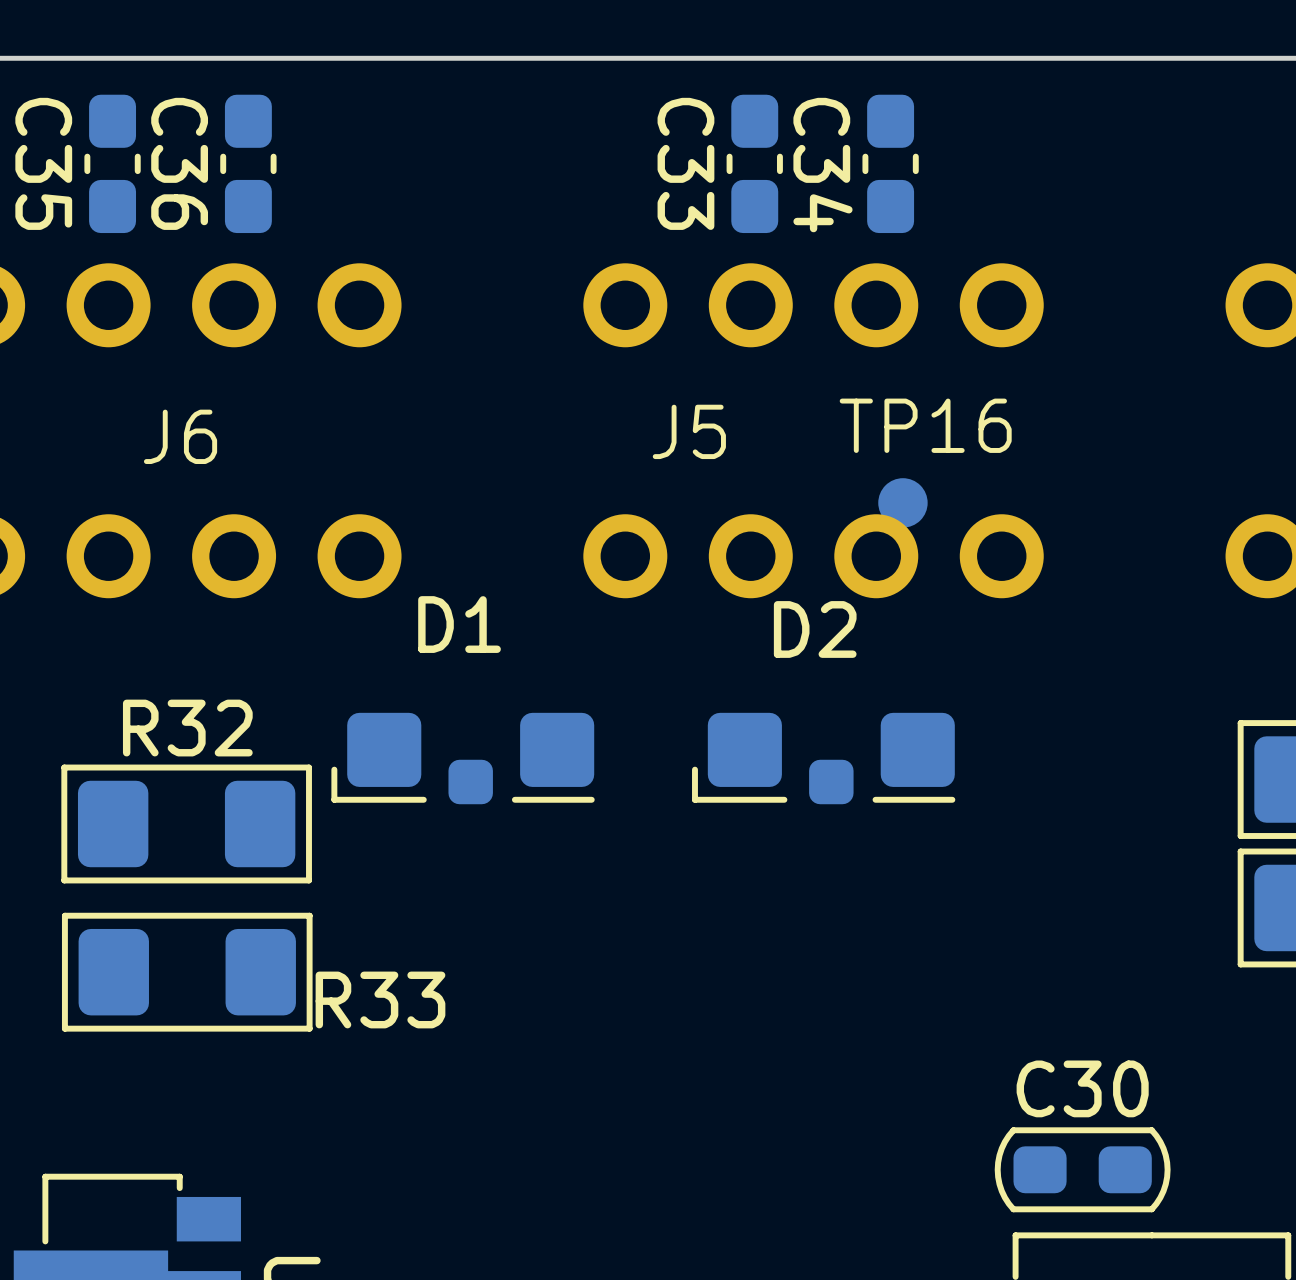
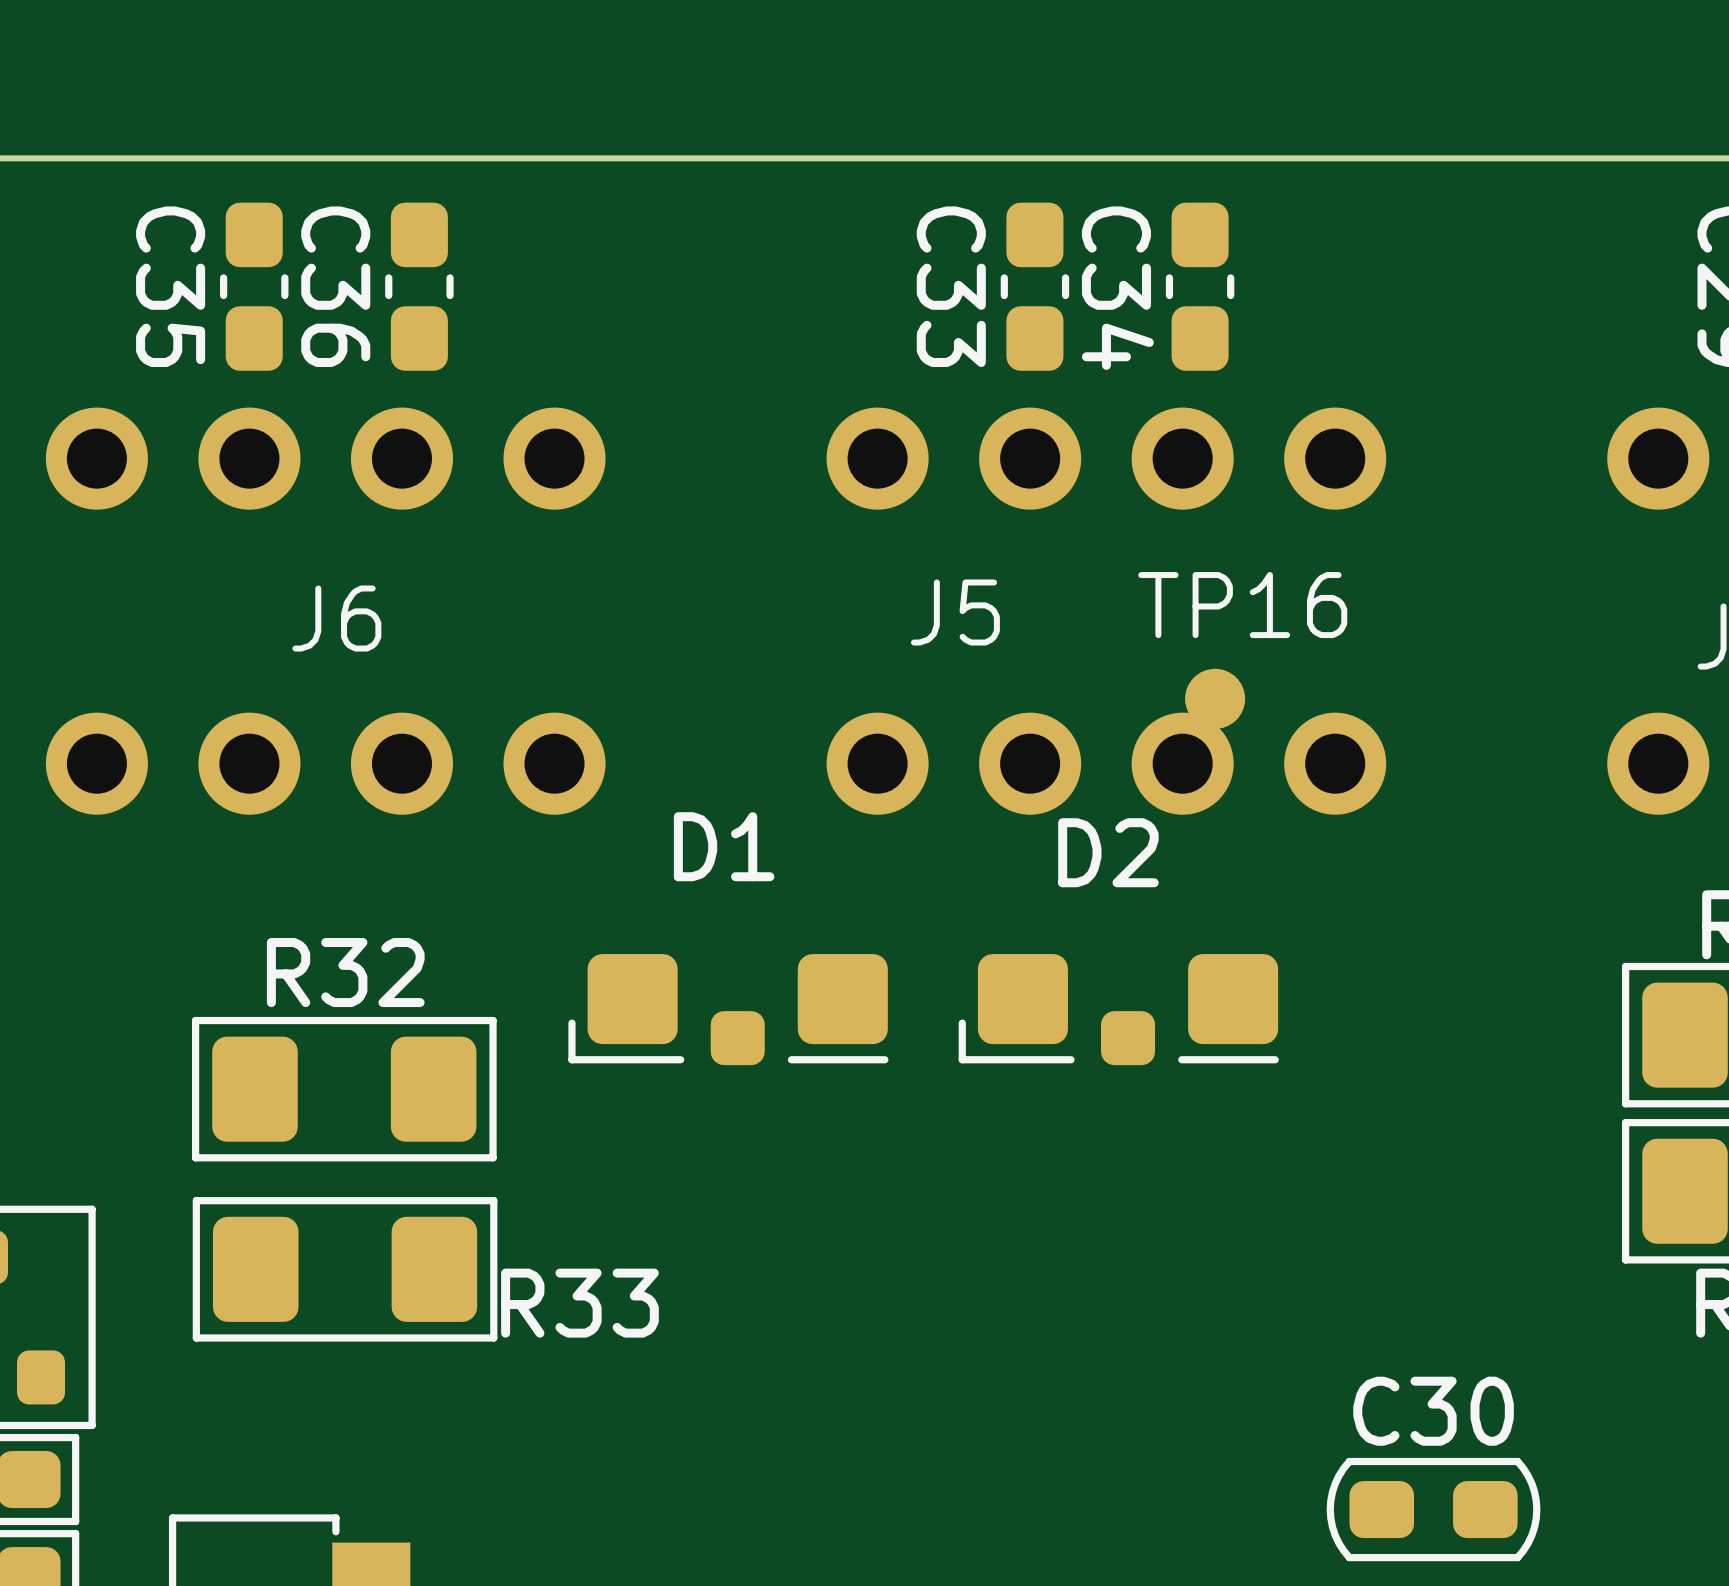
D1 position: (463, 758) -> (728, 1009)

